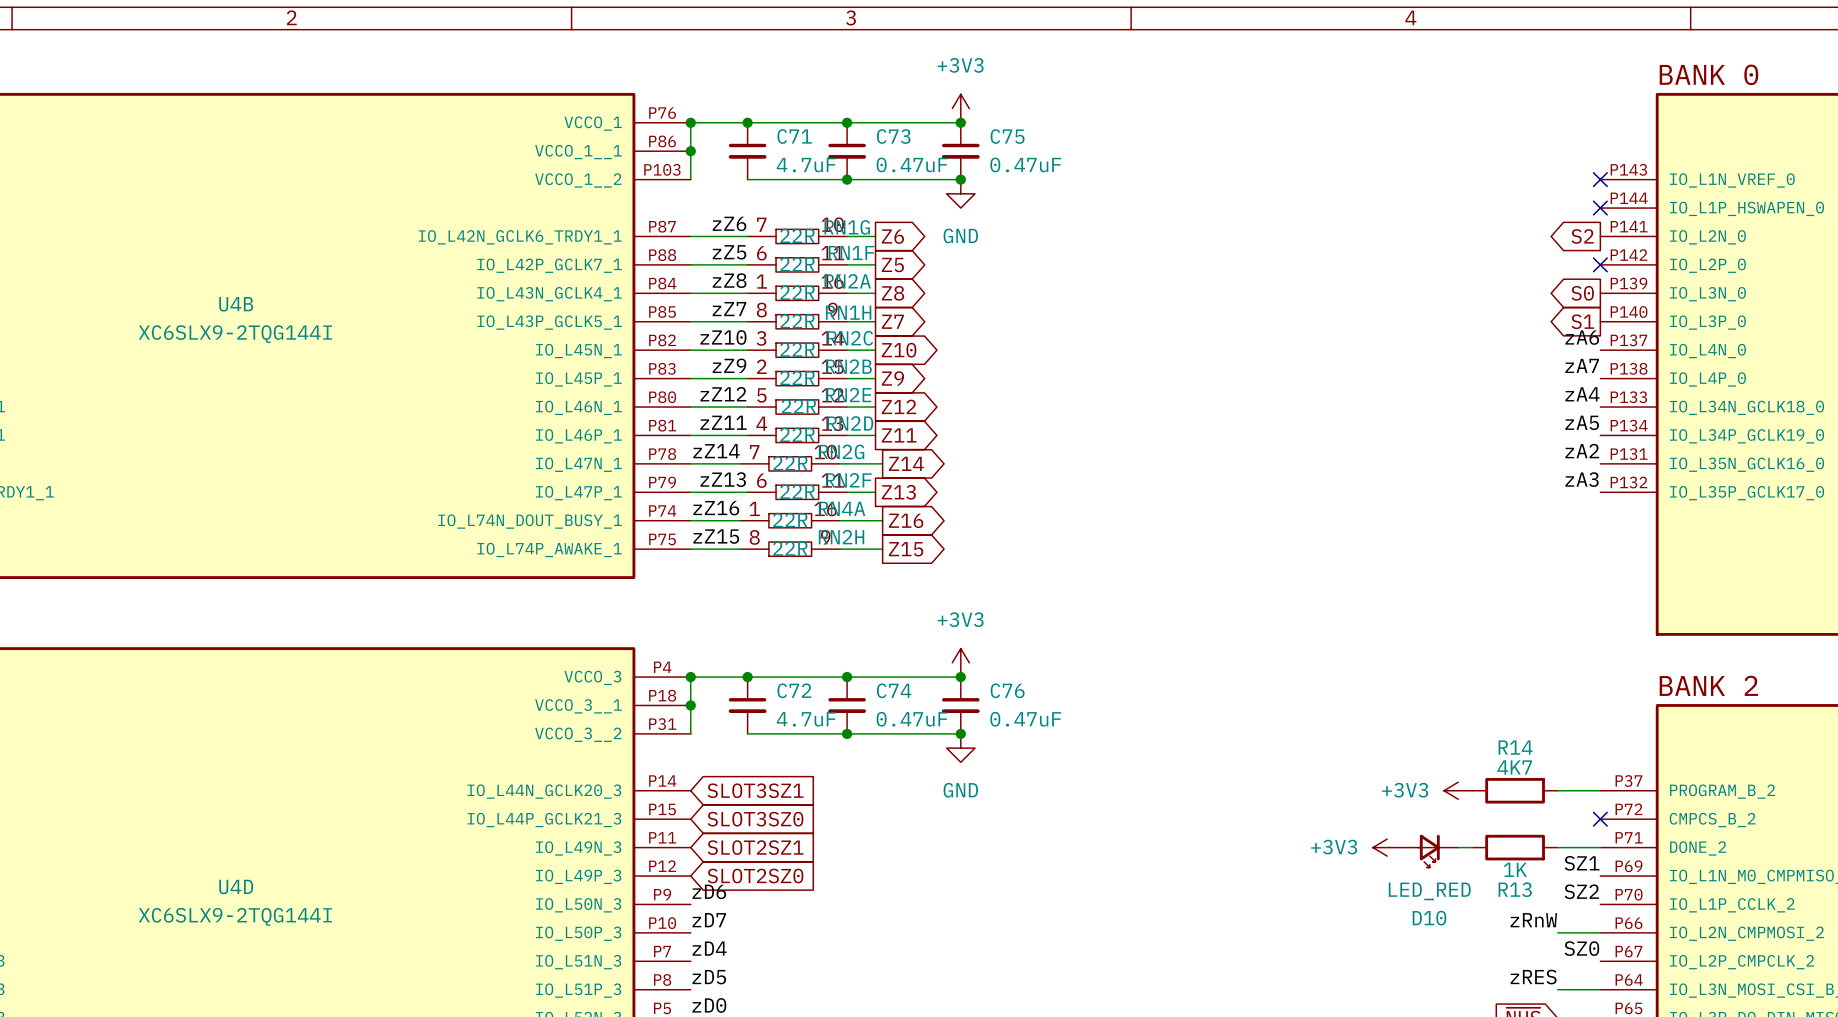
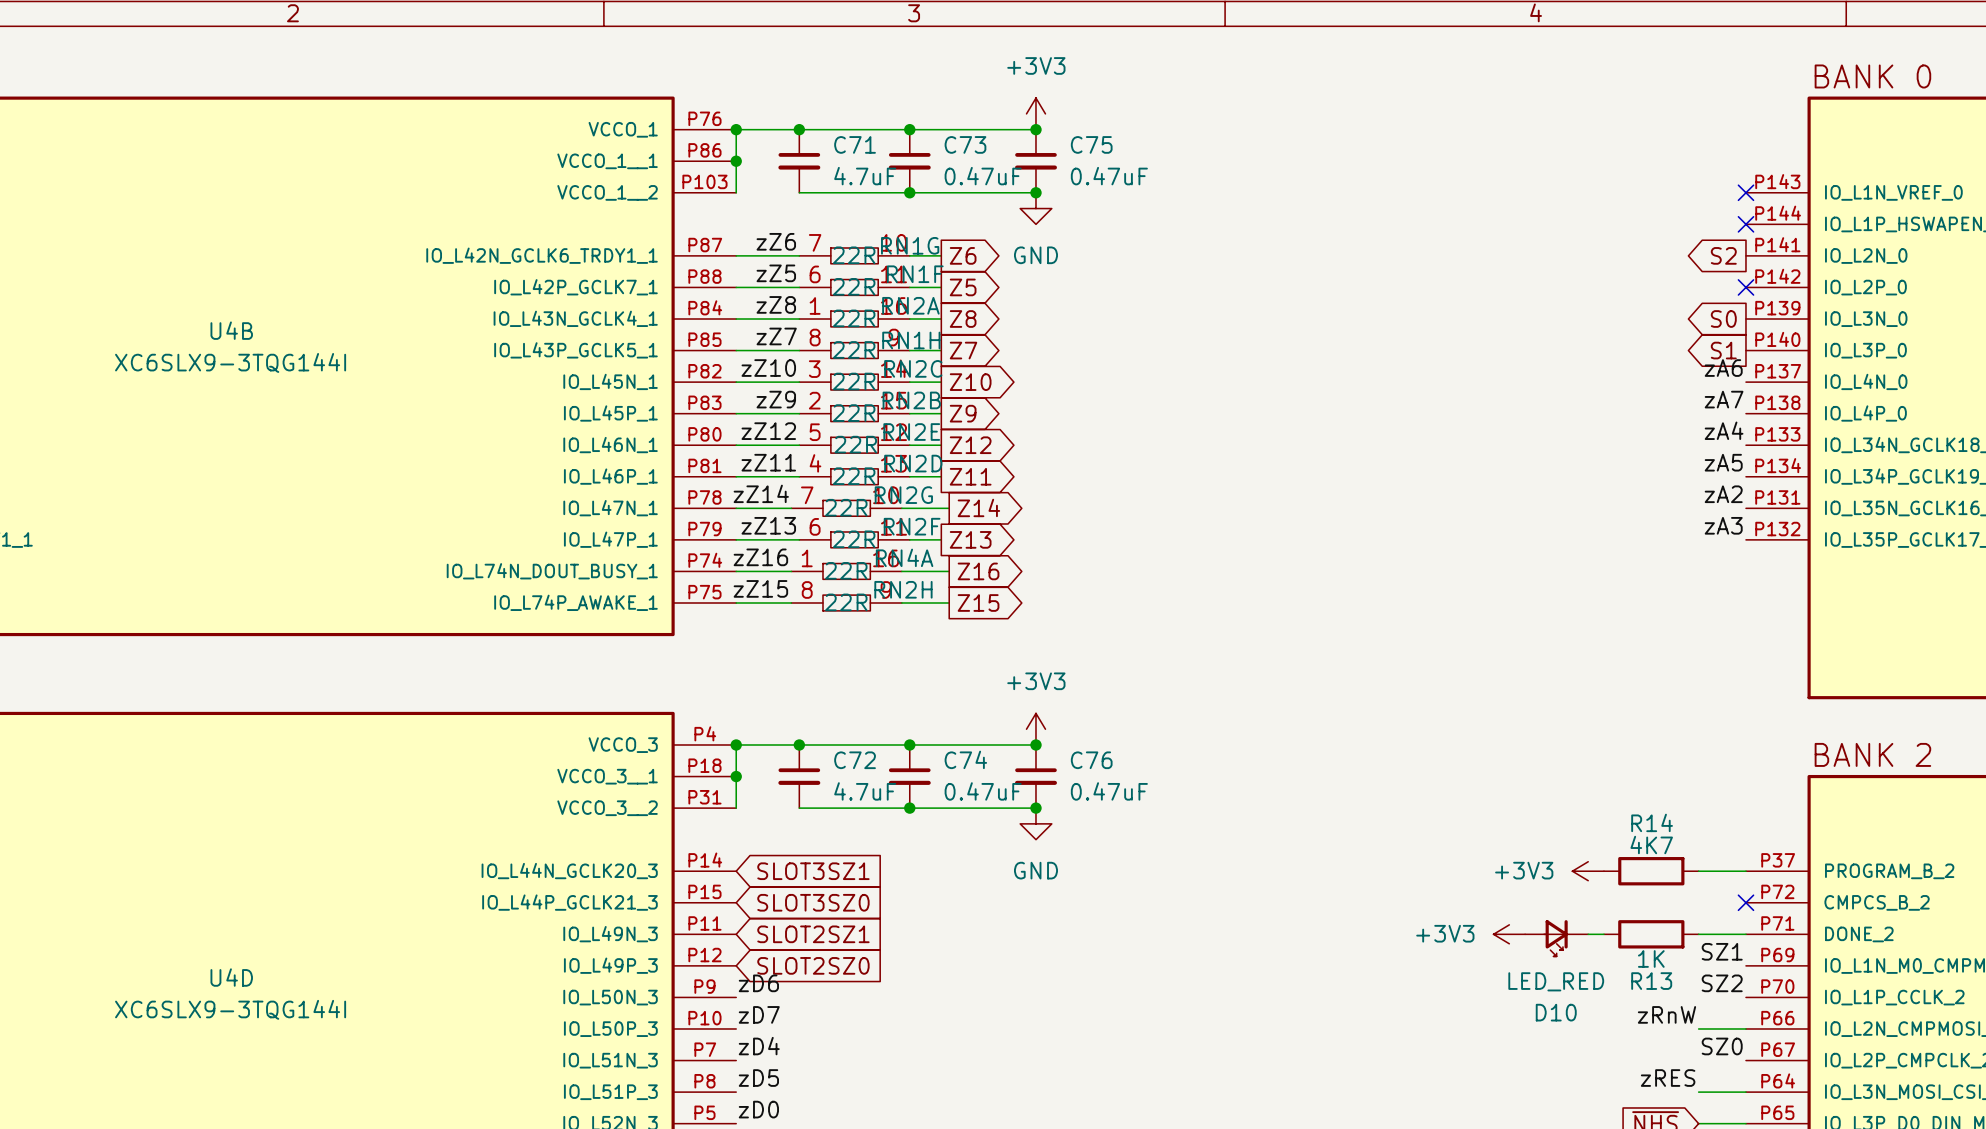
U4B value: XC6SLX9-2TQG144I (235, 334) -> XC6SLX9-3TQG144I (230, 362)
U4D value: XC6SLX9-2TQG144I (235, 916) -> XC6SLX9-3TQG144I (230, 1009)

